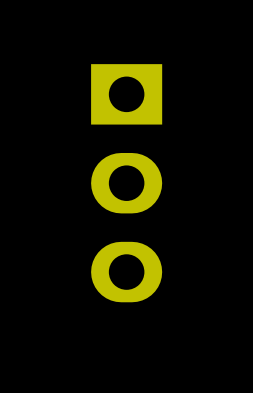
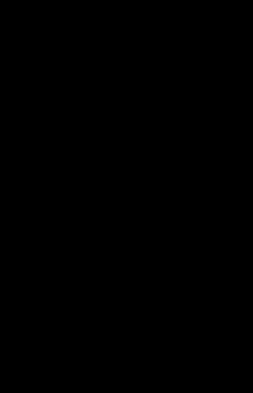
part: (126, 183) -> none

